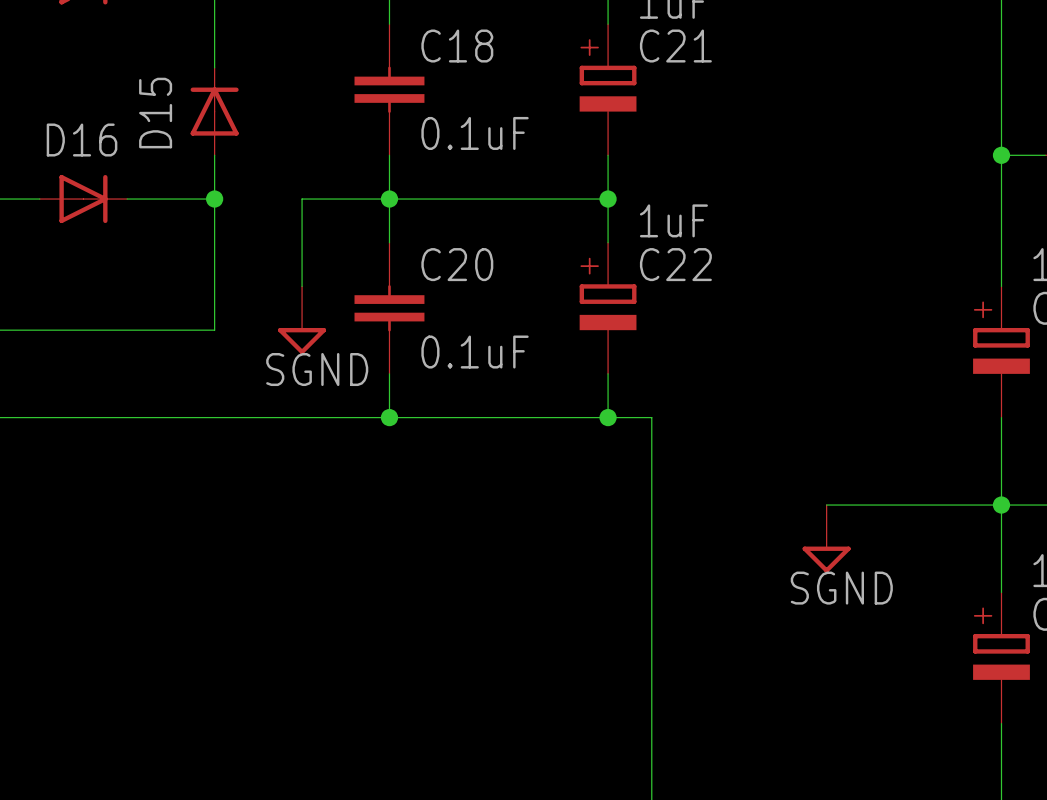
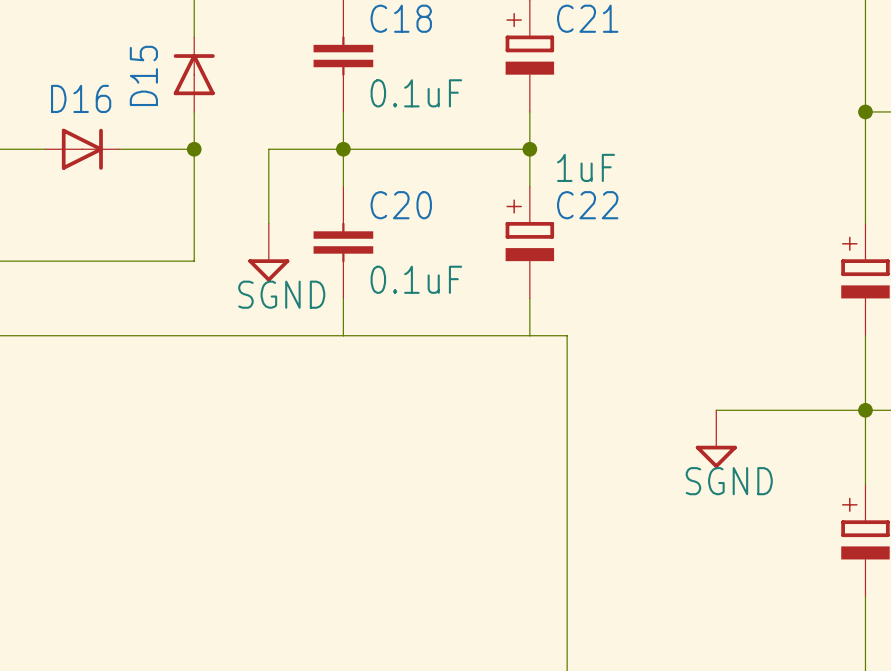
junction: (389, 417) -> none
junction: (608, 417) -> none

